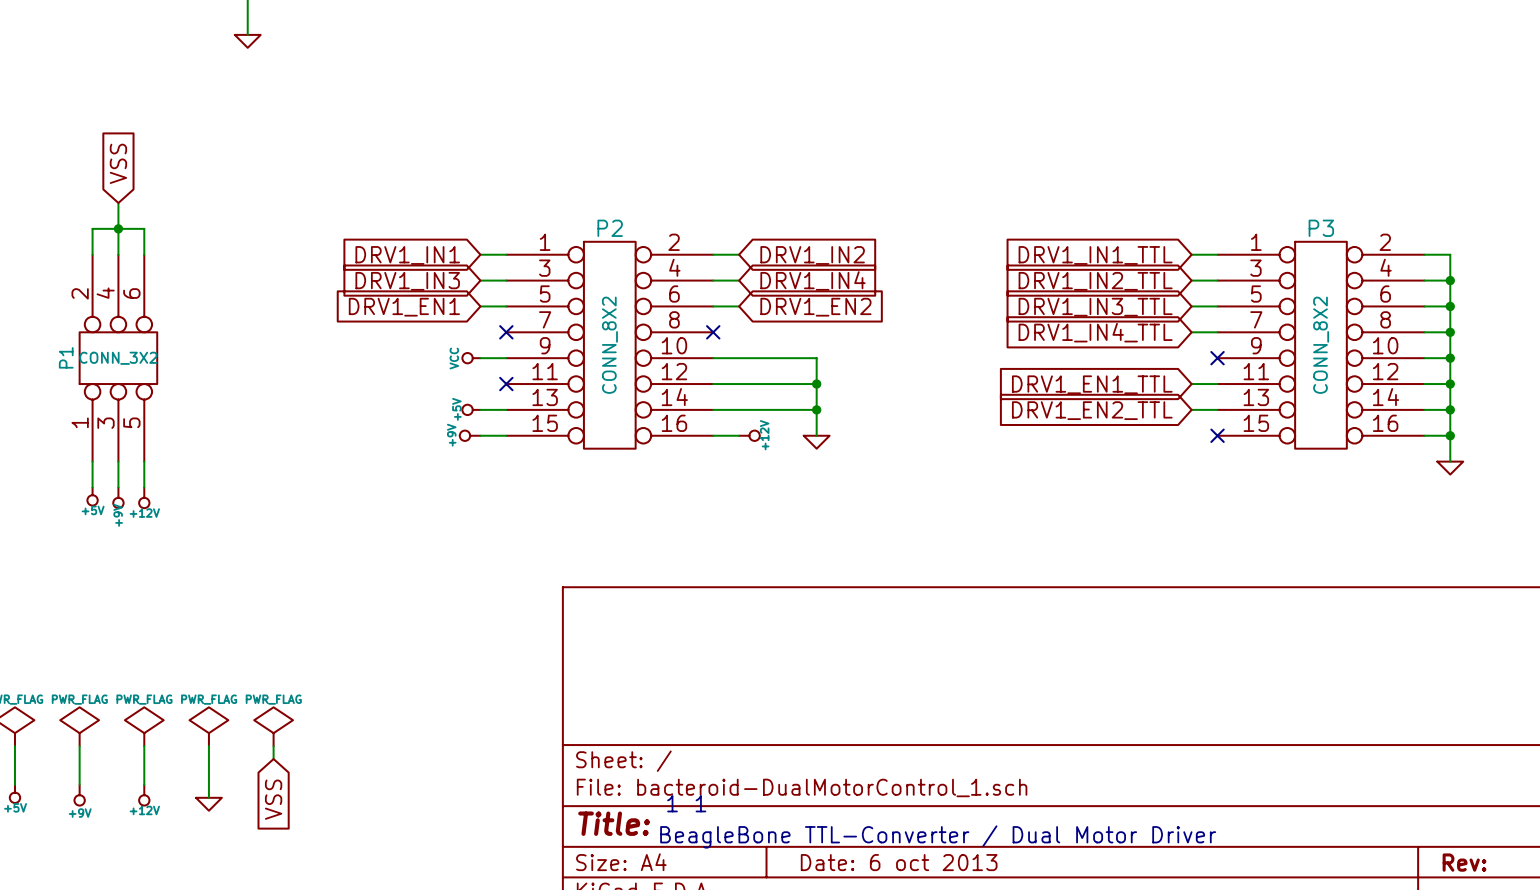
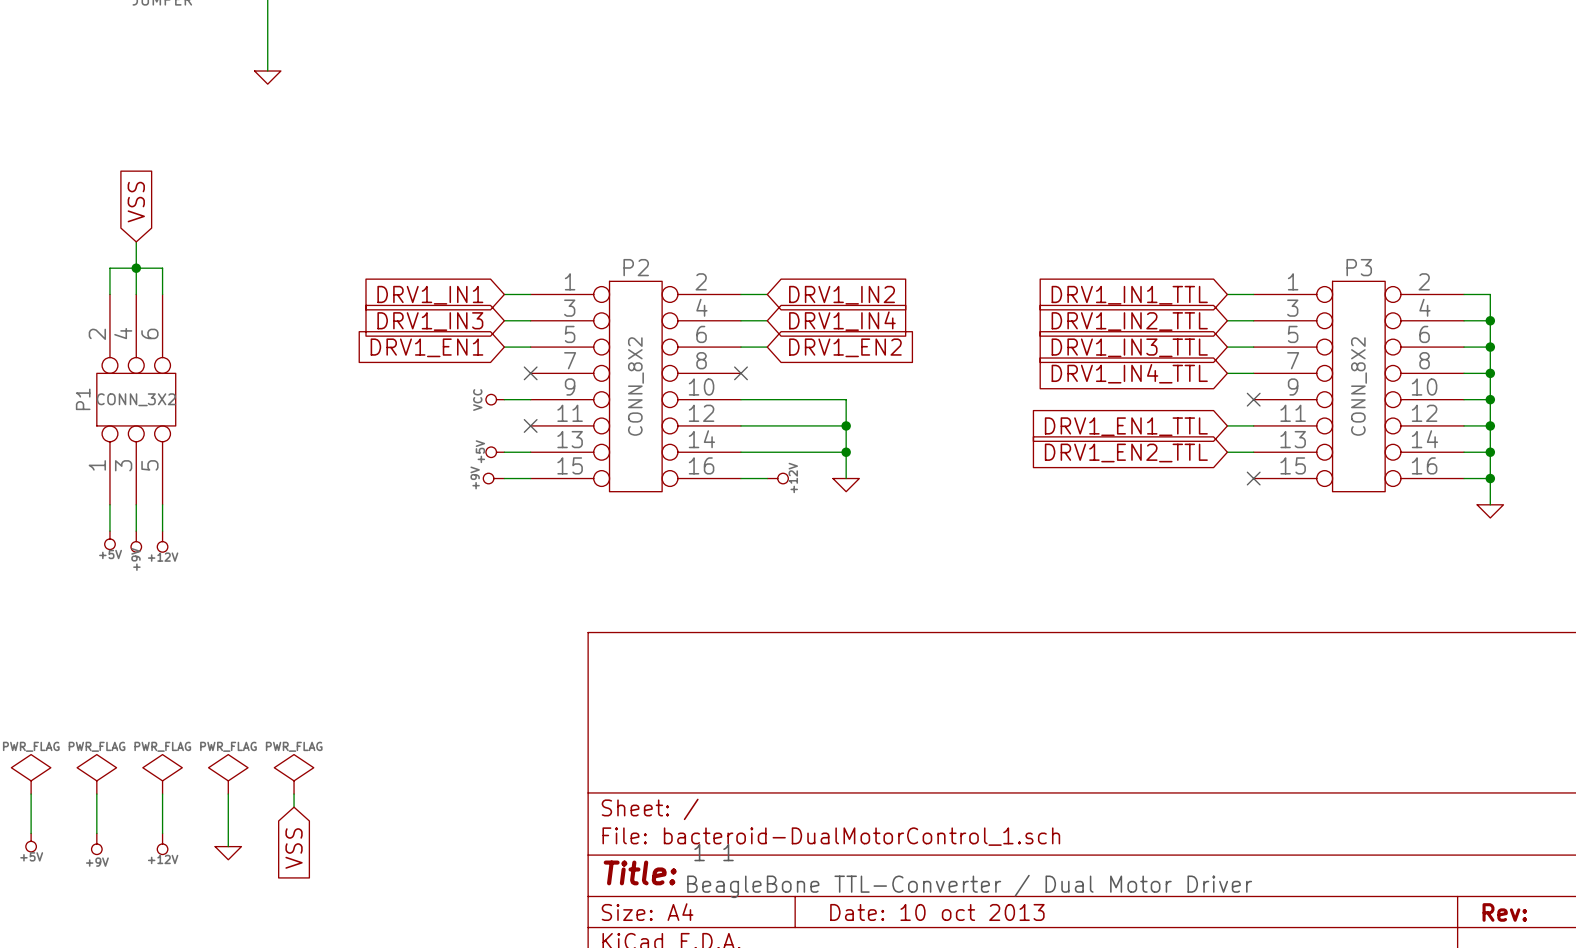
title block: Date: 6 oct 2013 (899, 862) -> Date: 10 oct 2013 (937, 912)

